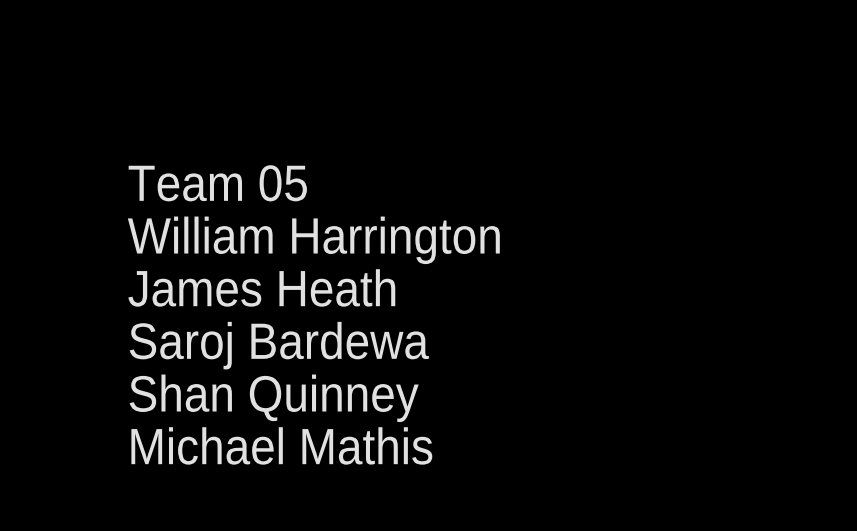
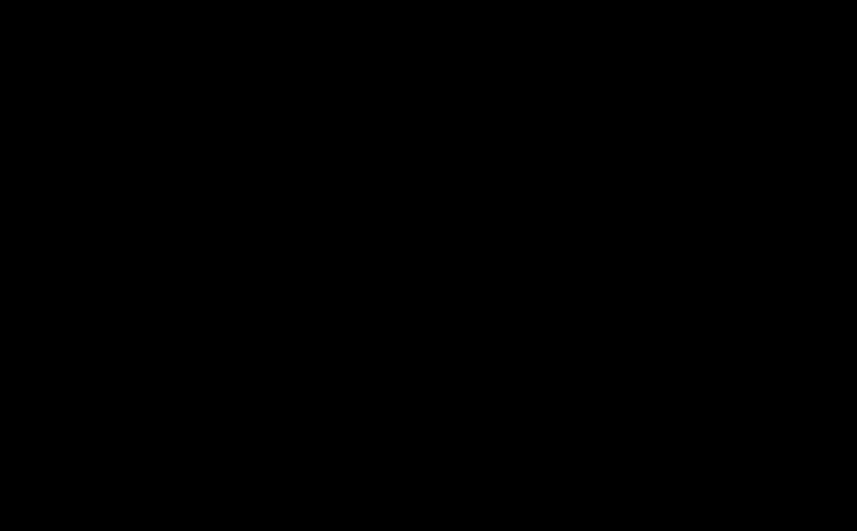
text: Team 05 (217, 183) -> none
text: William Harrington (313, 240) -> none
text: James Heath (261, 287) -> none
text: Saroj Bardewa (279, 345) -> none
text: Shan Quinney (274, 398) -> none
text: Michael Mathis (281, 445) -> none

